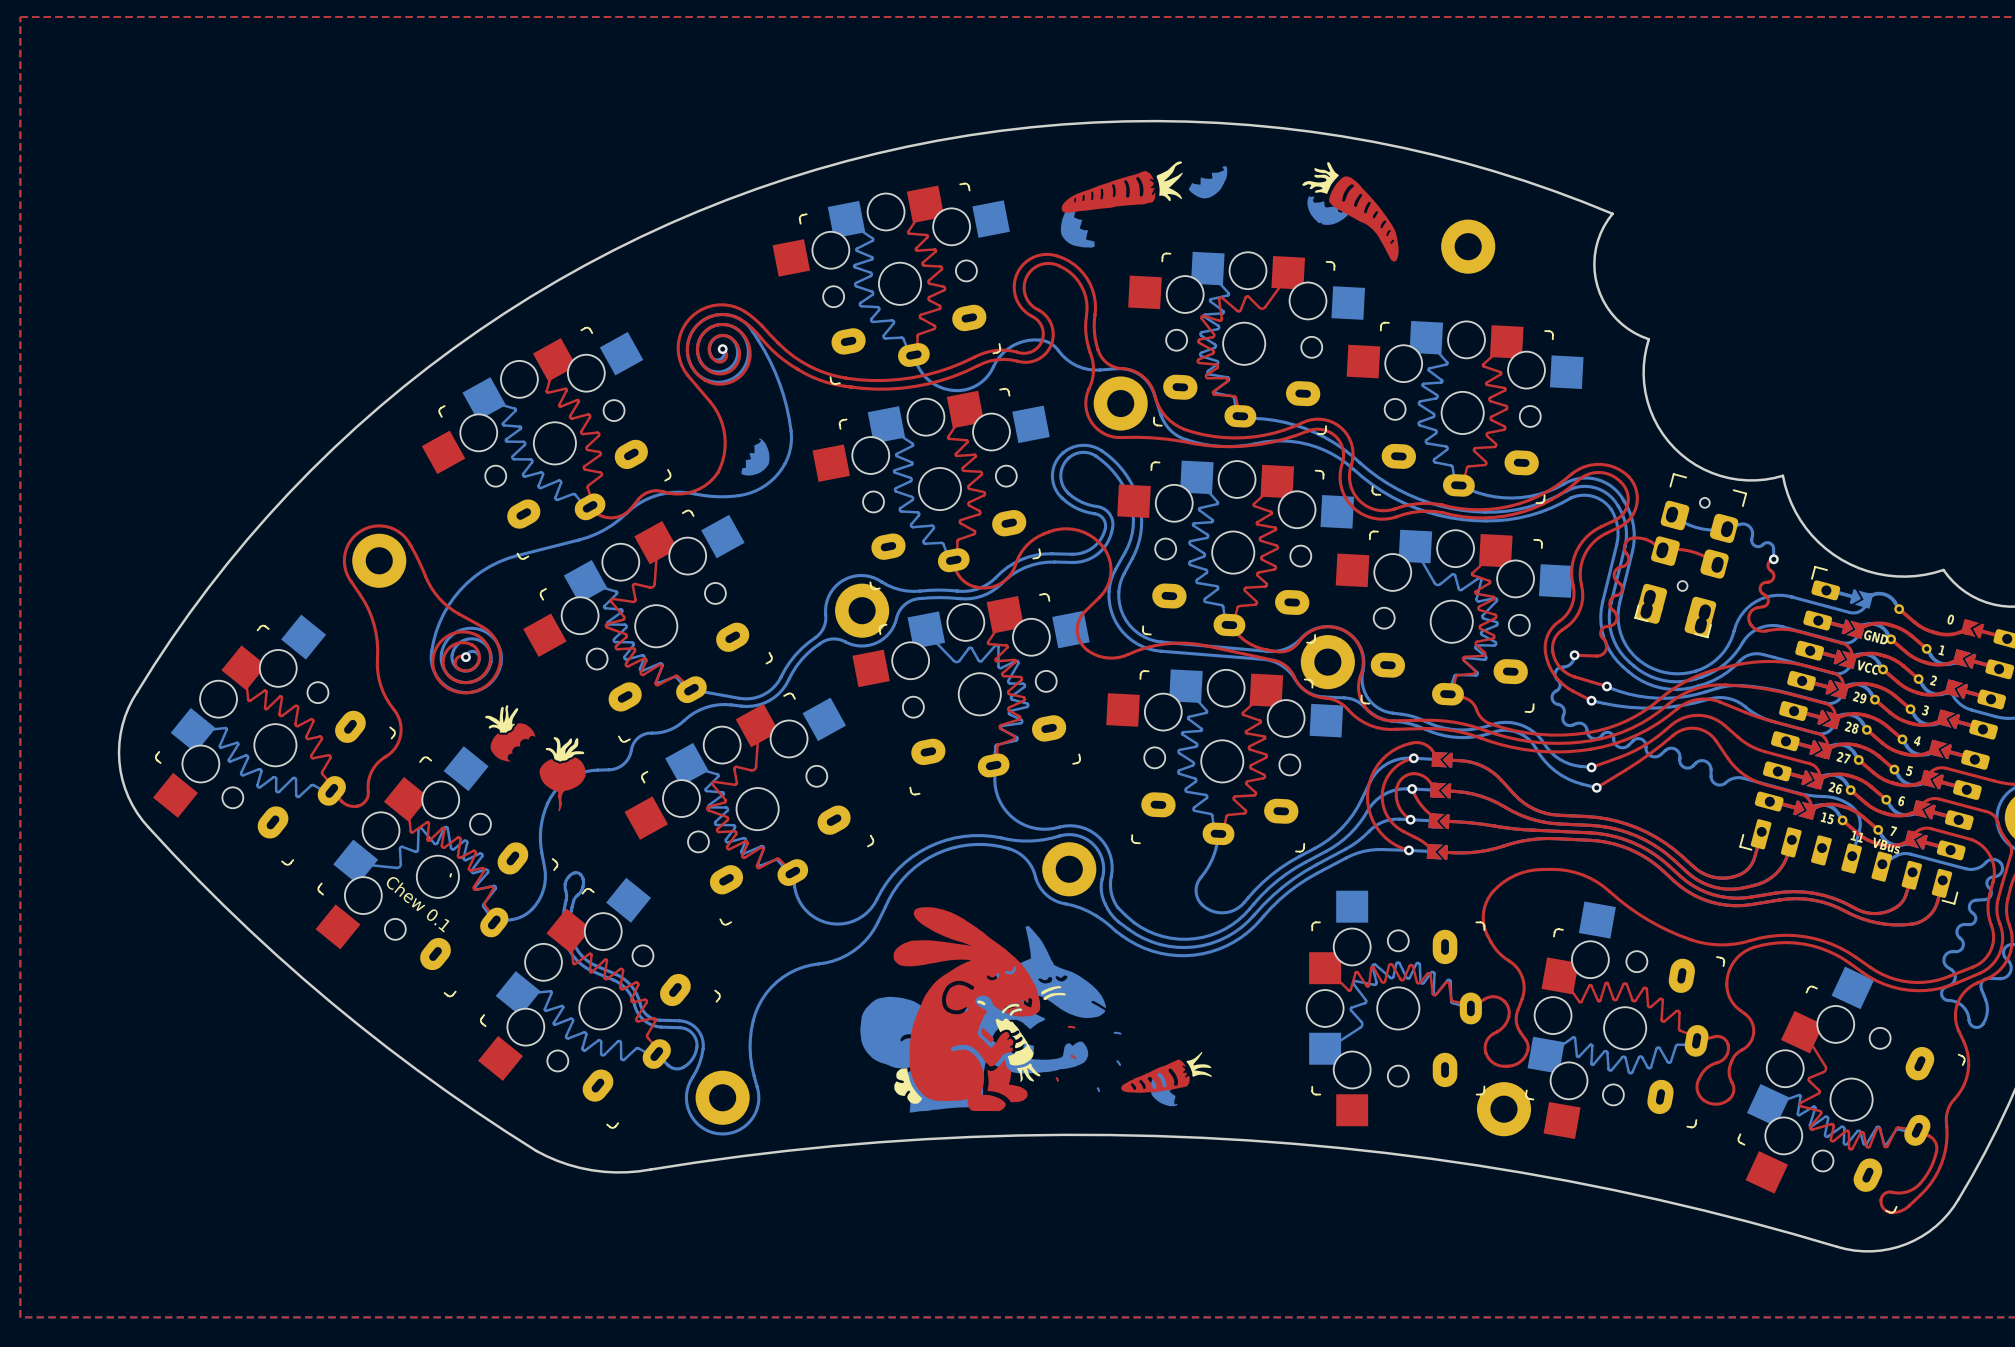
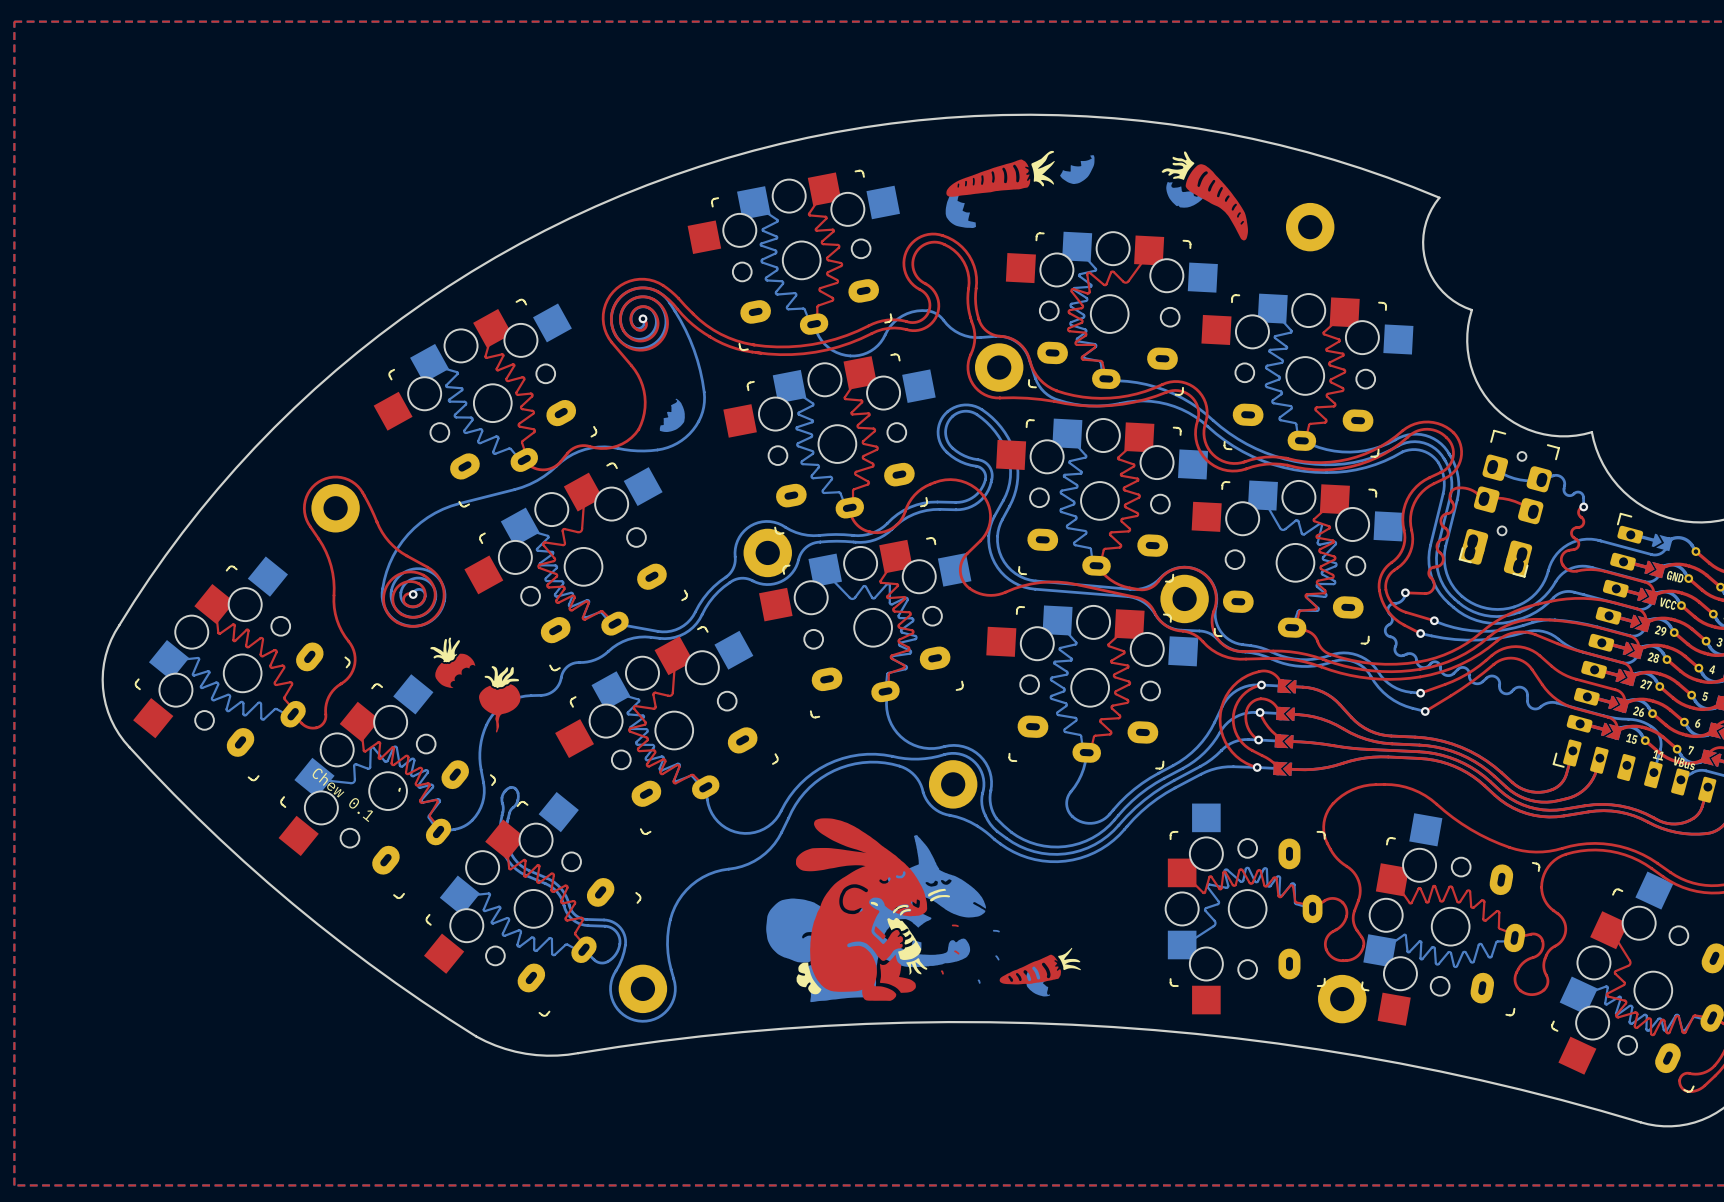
text position: Chew 0.1 (418, 904) -> Chew 0.1 (342, 795)

